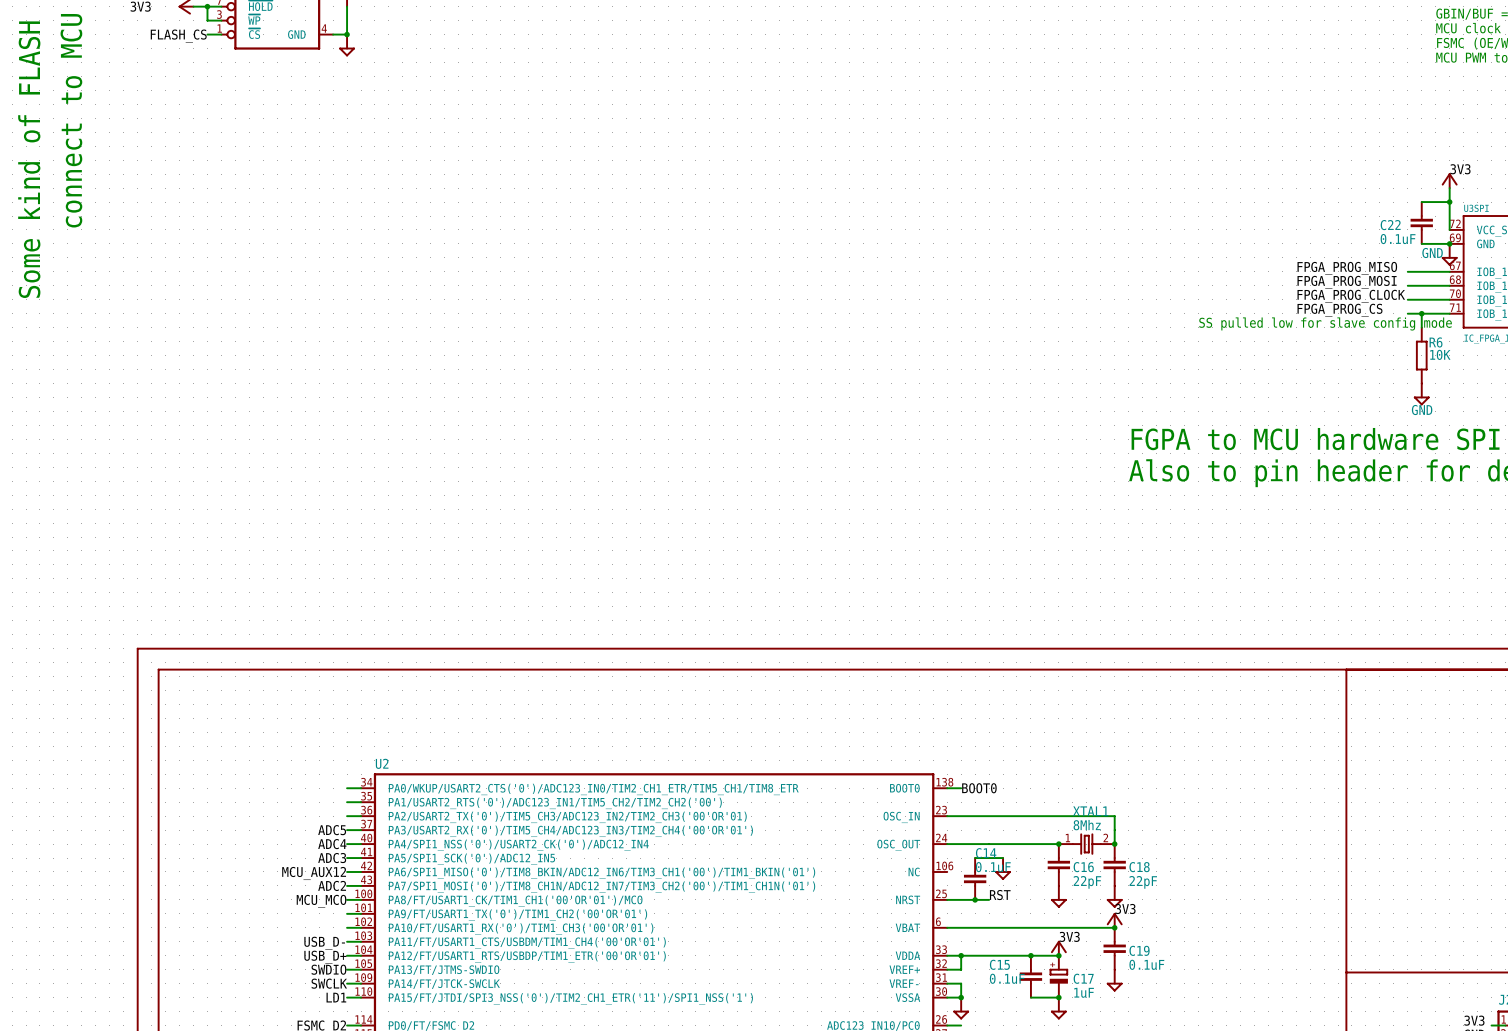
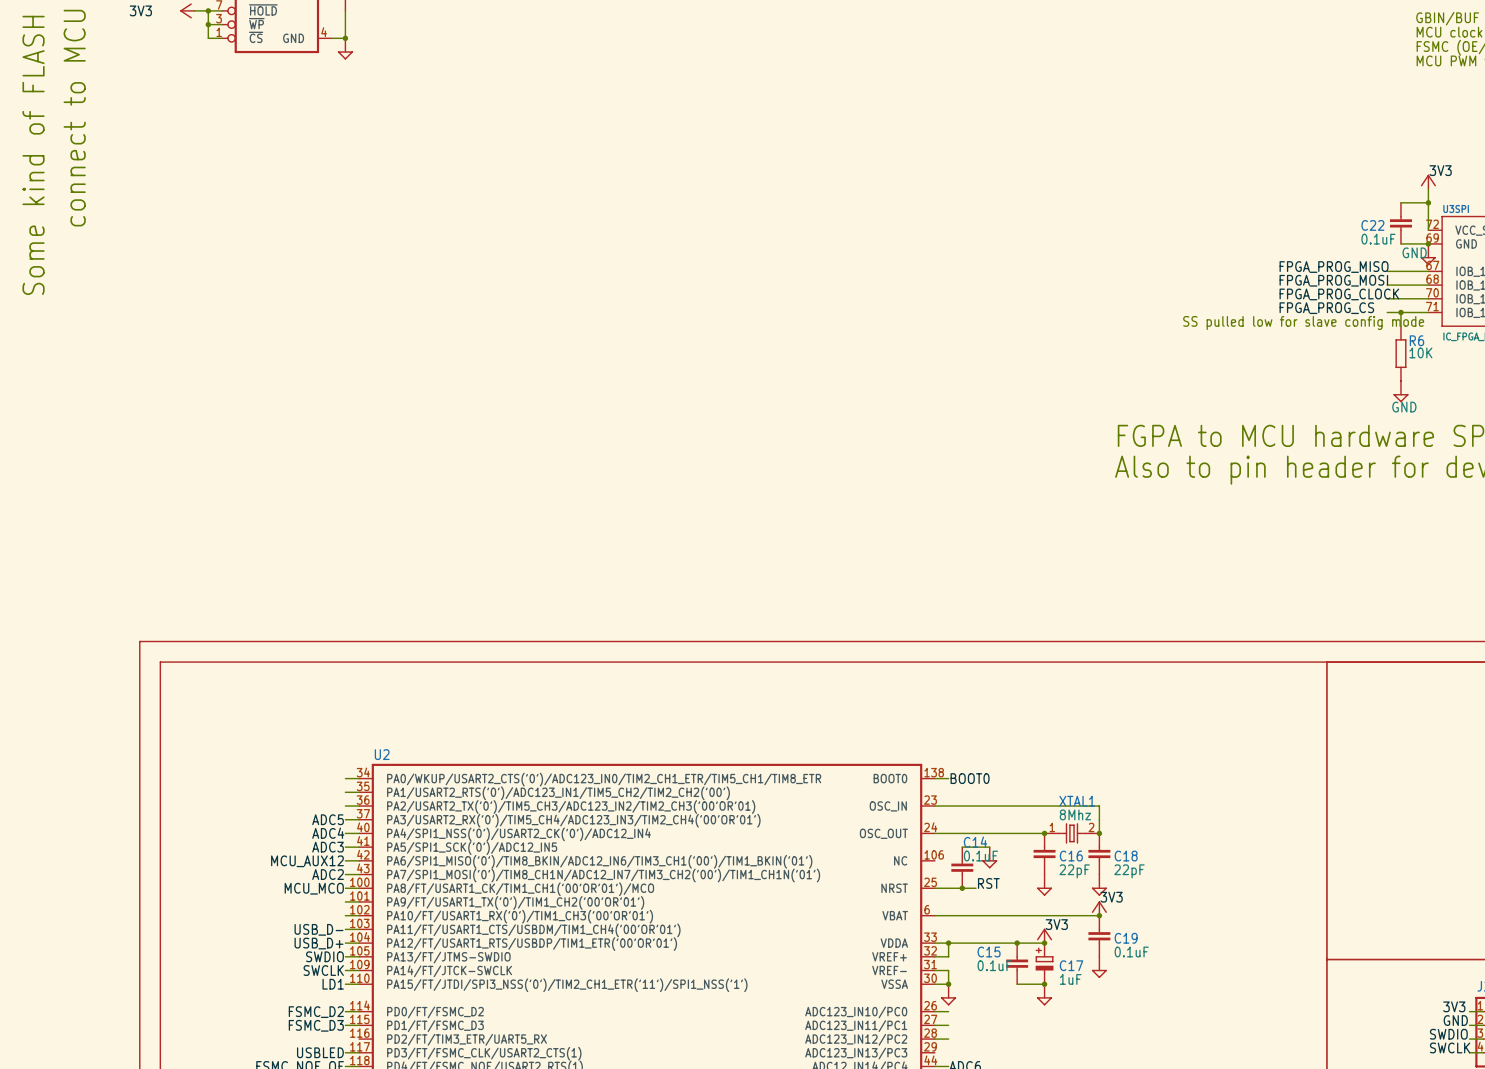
wire: none -> (208, 24) (208, 38)
junction: none -> (208, 24)
label: FLASH_CS (178, 36) -> none

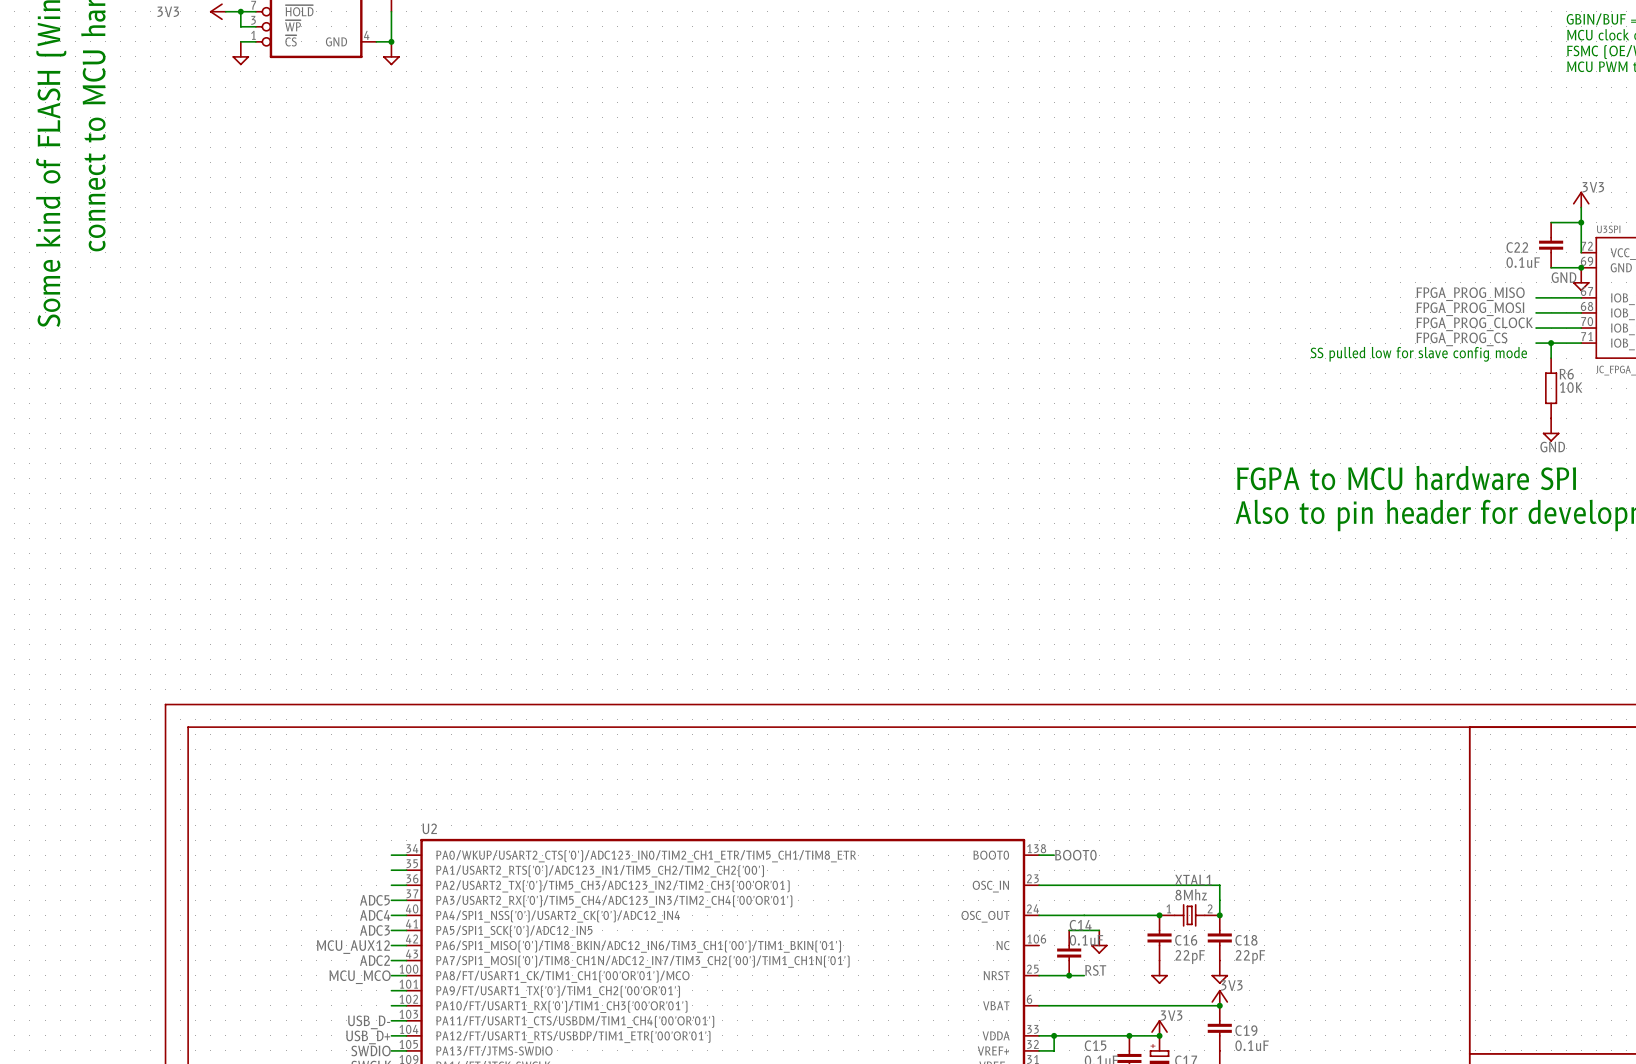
wire: (208, 24) (208, 38) -> none
junction: (208, 24) -> none
power symbol: none -> (240, 53)

